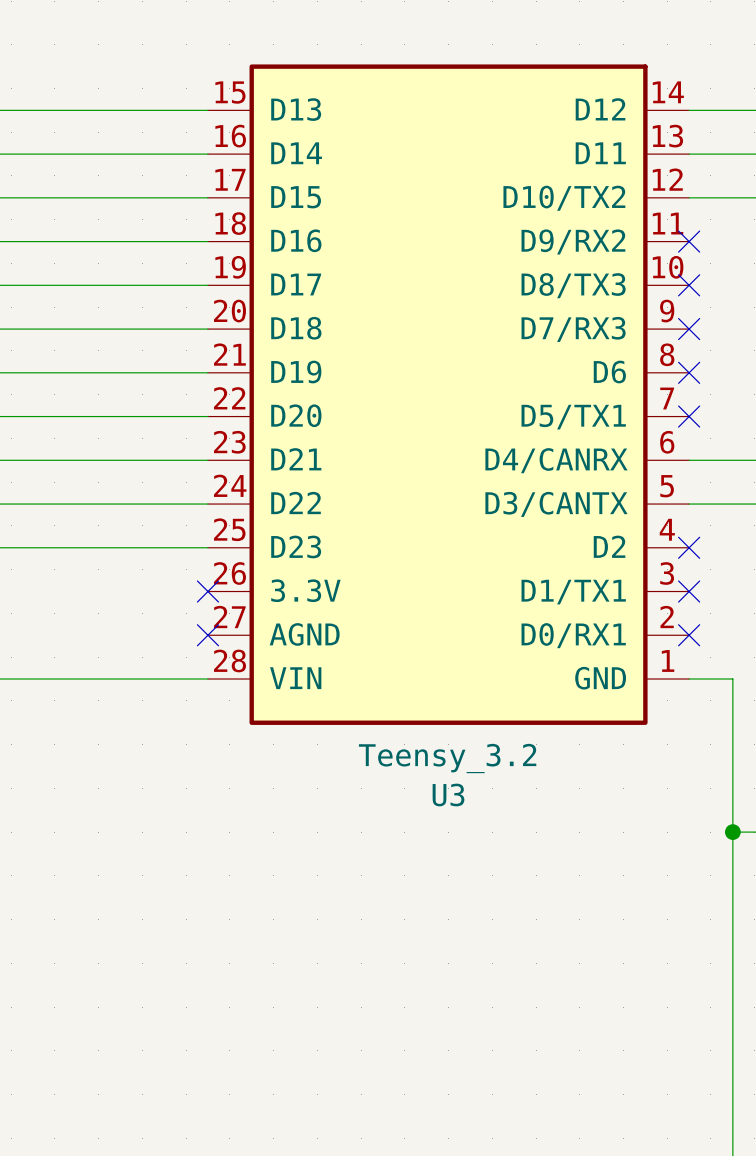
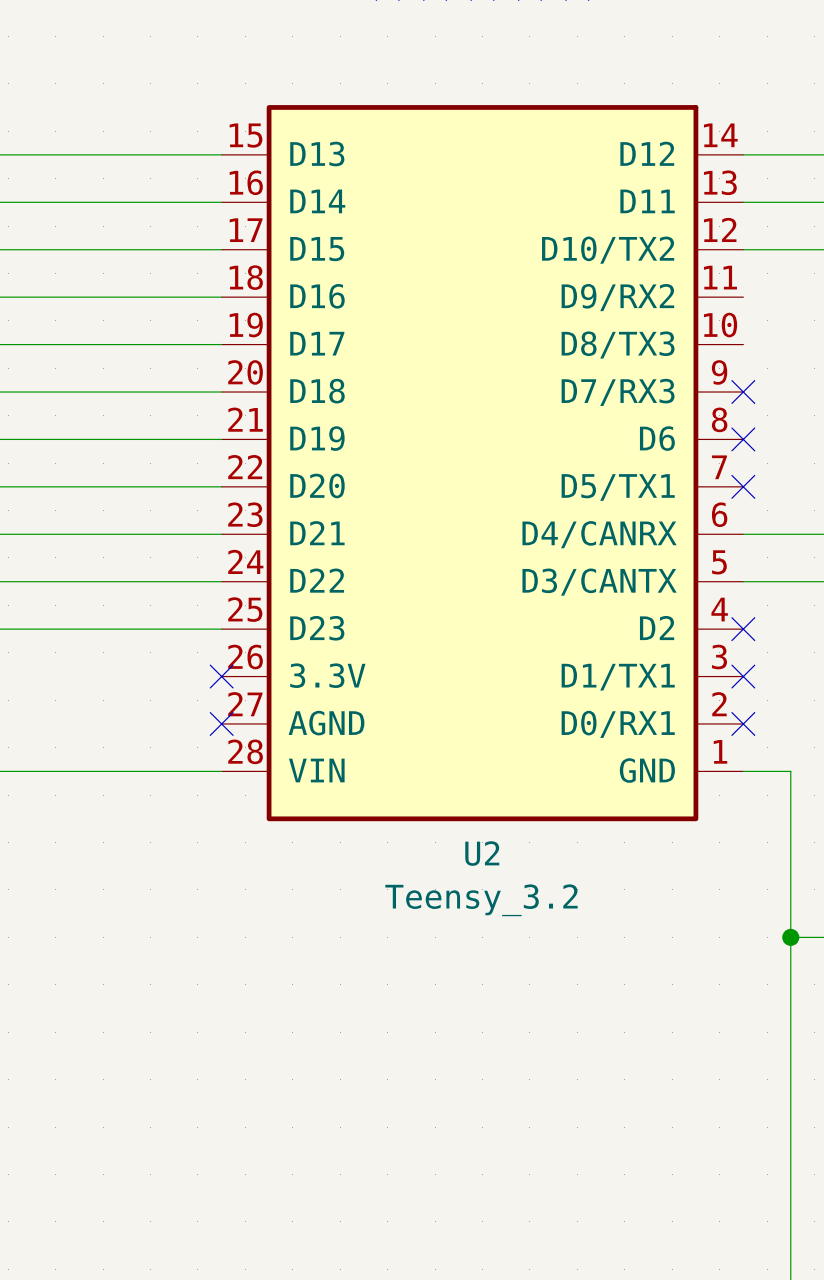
no-connect mark: (689, 241) -> none
no-connect mark: (689, 285) -> none
U3 value position: Teensy_3.2 (447, 758) -> Teensy_3.2 (481, 900)
U3 name: U3 (448, 794) -> U2 (482, 853)

